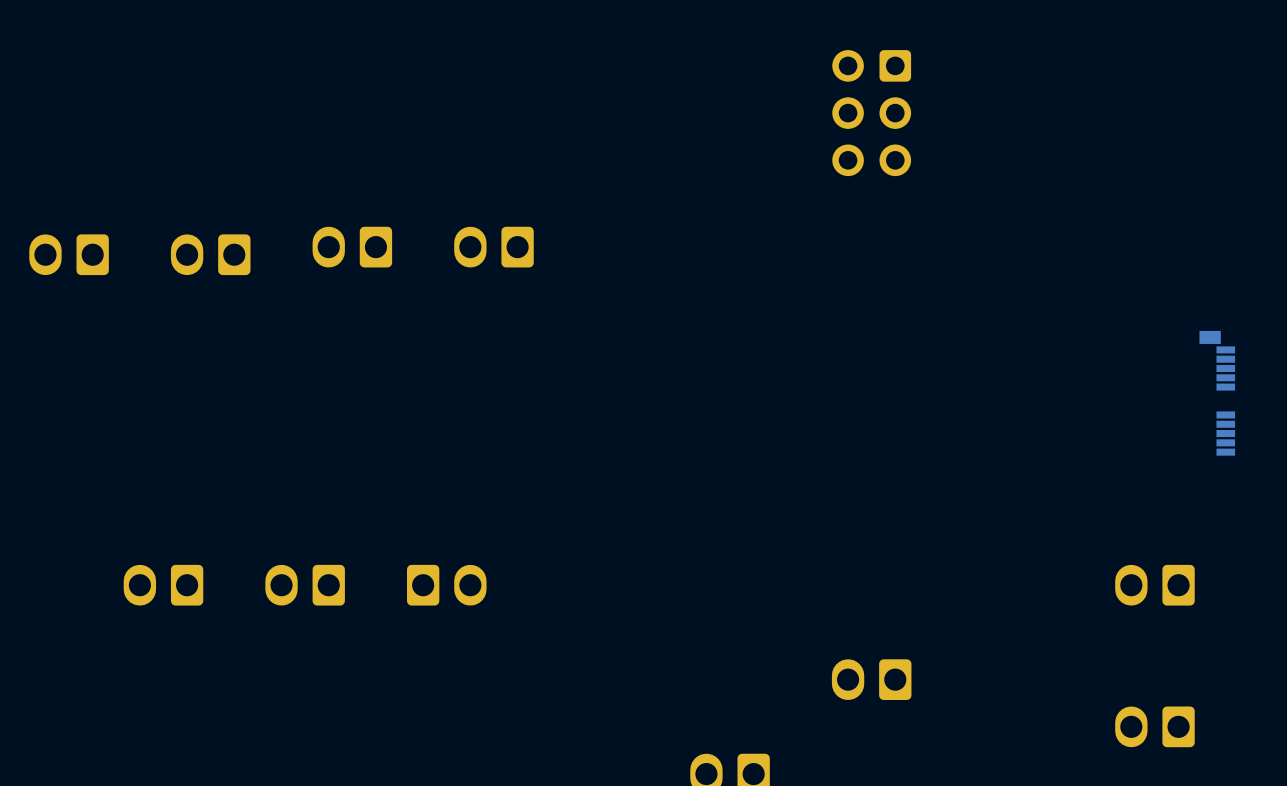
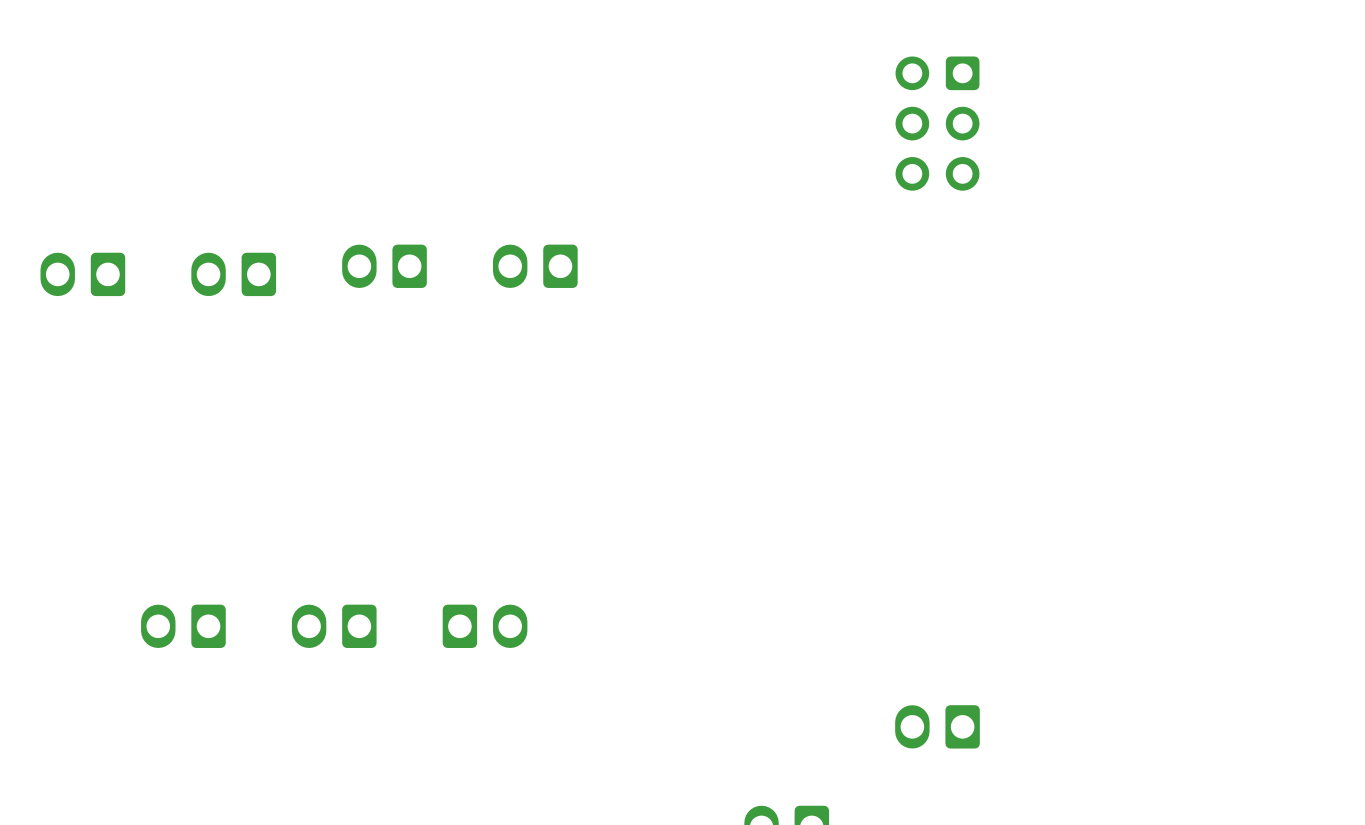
part: (1217, 393) -> none
part: (1154, 585) -> none
part: (1154, 726) -> none

